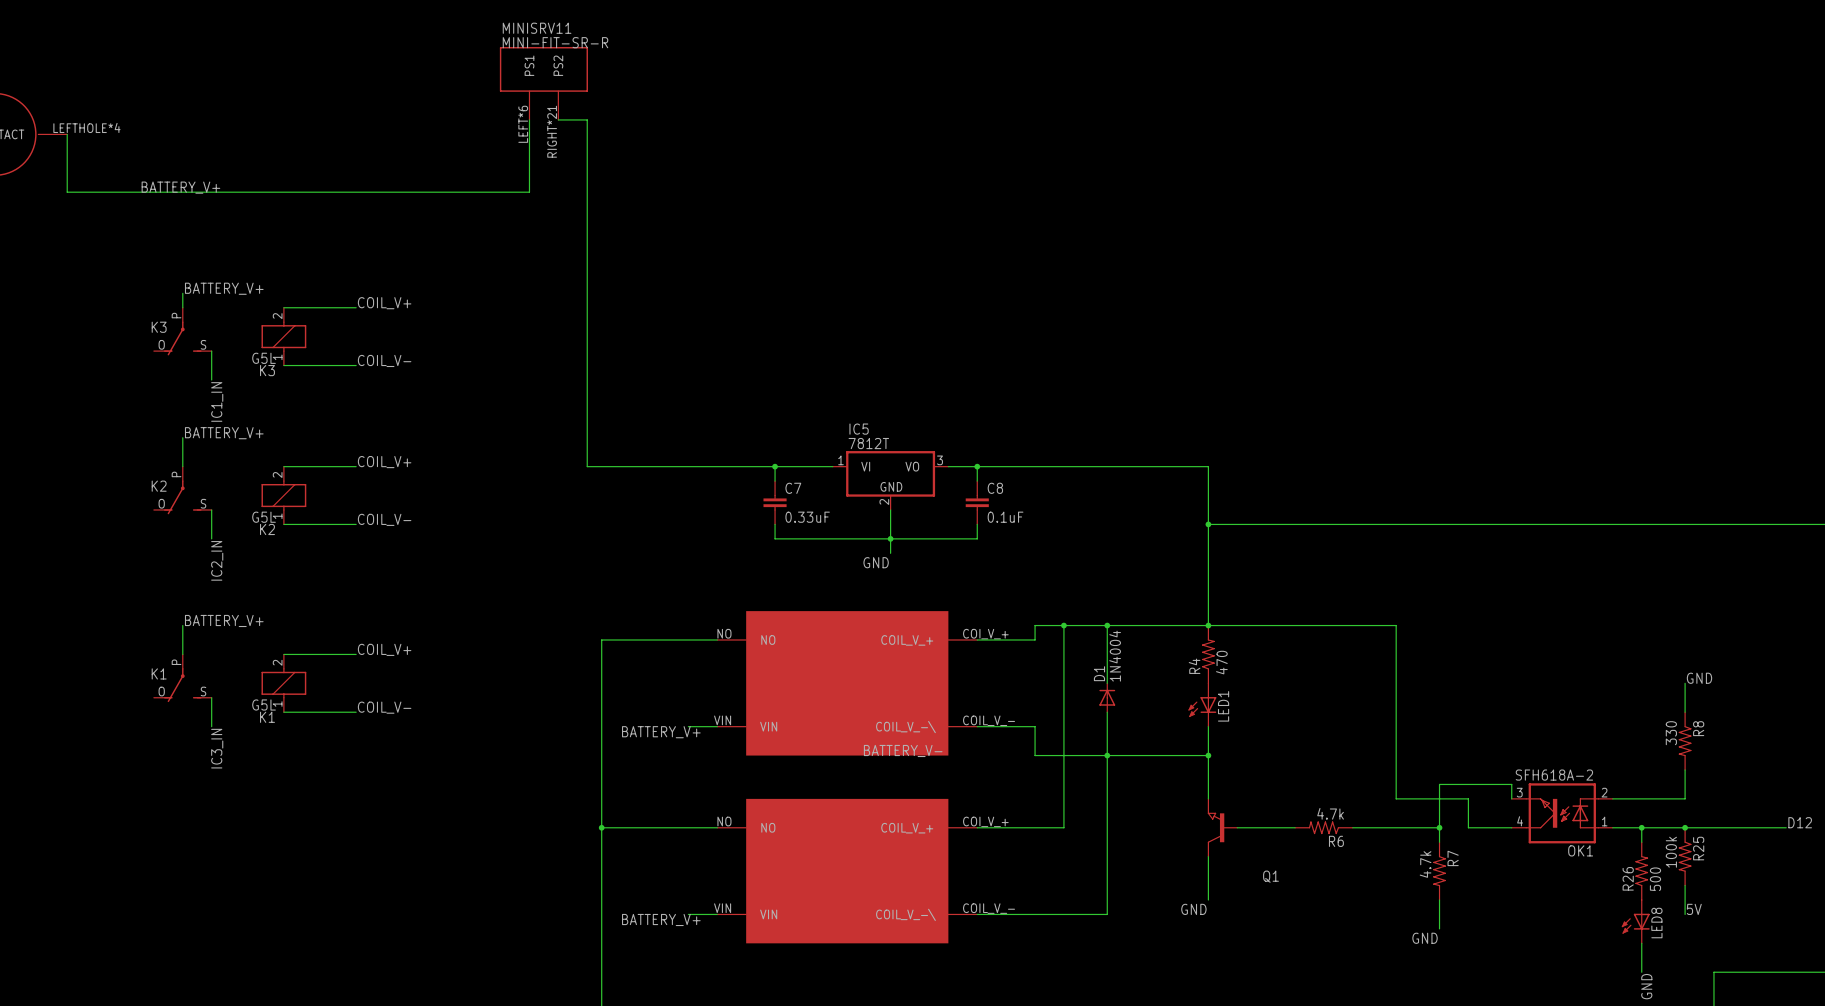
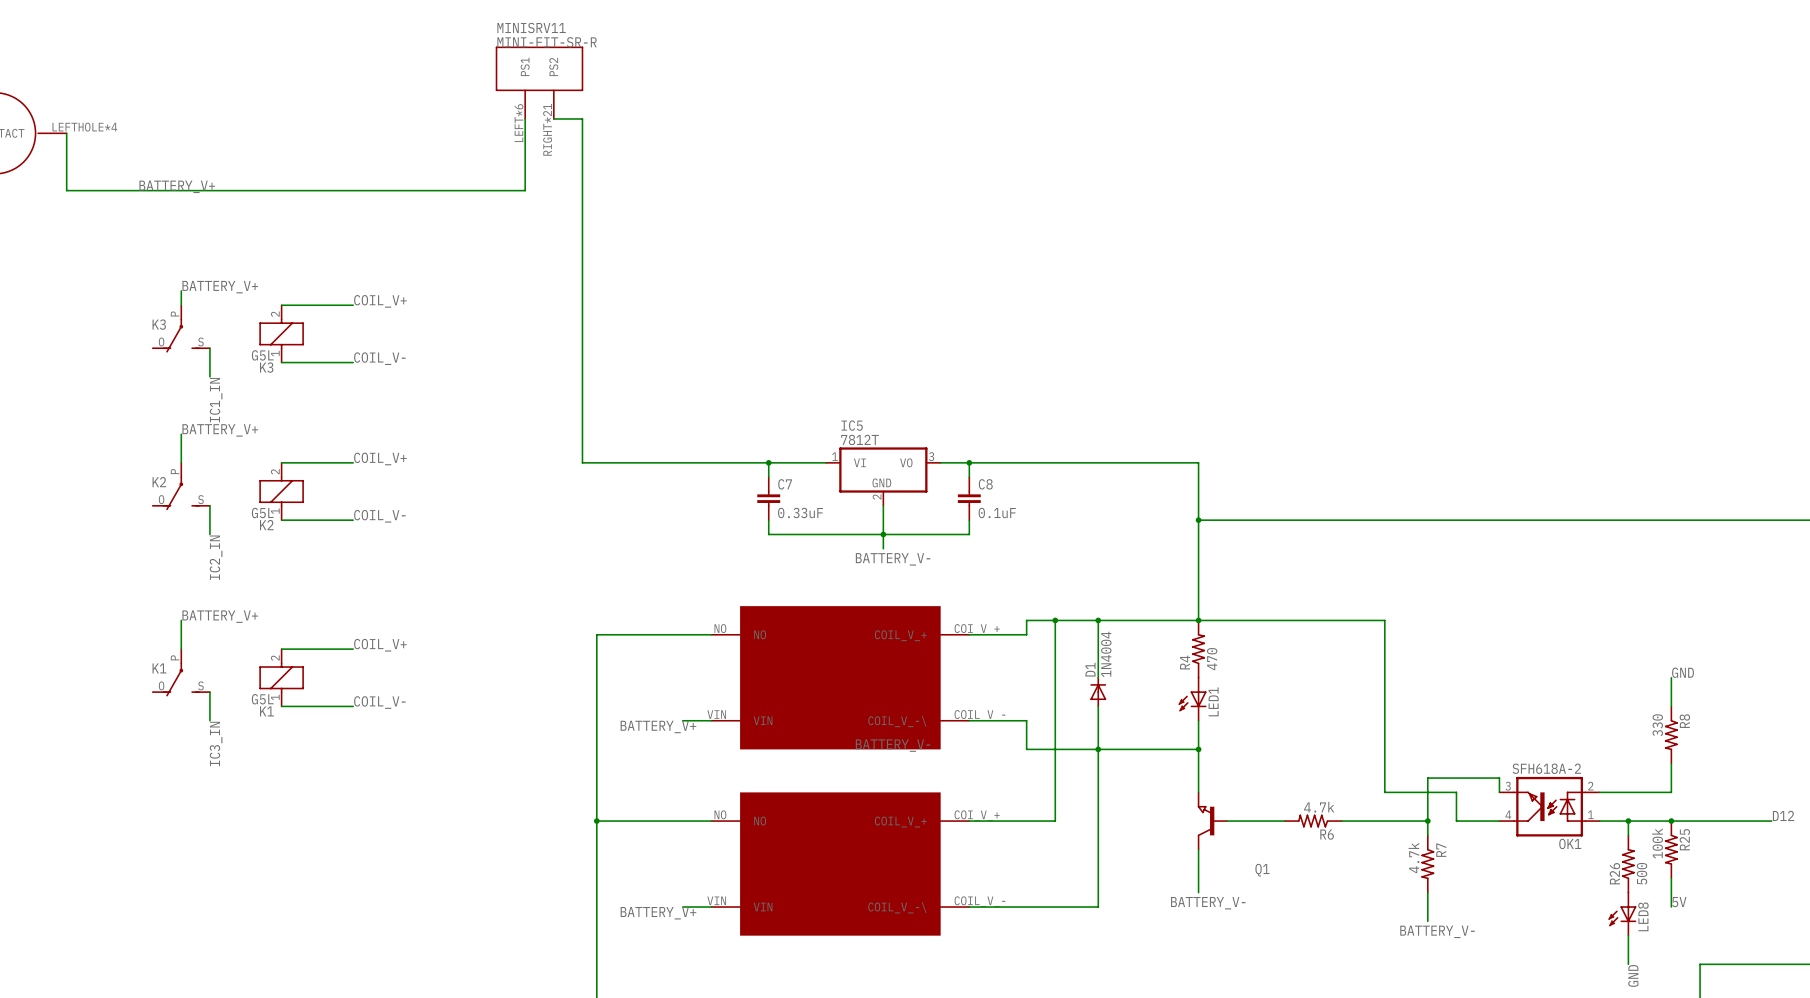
label: GND (876, 562) -> BATTERY_V- (893, 559)
label: GND (1193, 909) -> BATTERY_V- (1208, 903)
label: GND (1425, 938) -> BATTERY_V- (1437, 931)

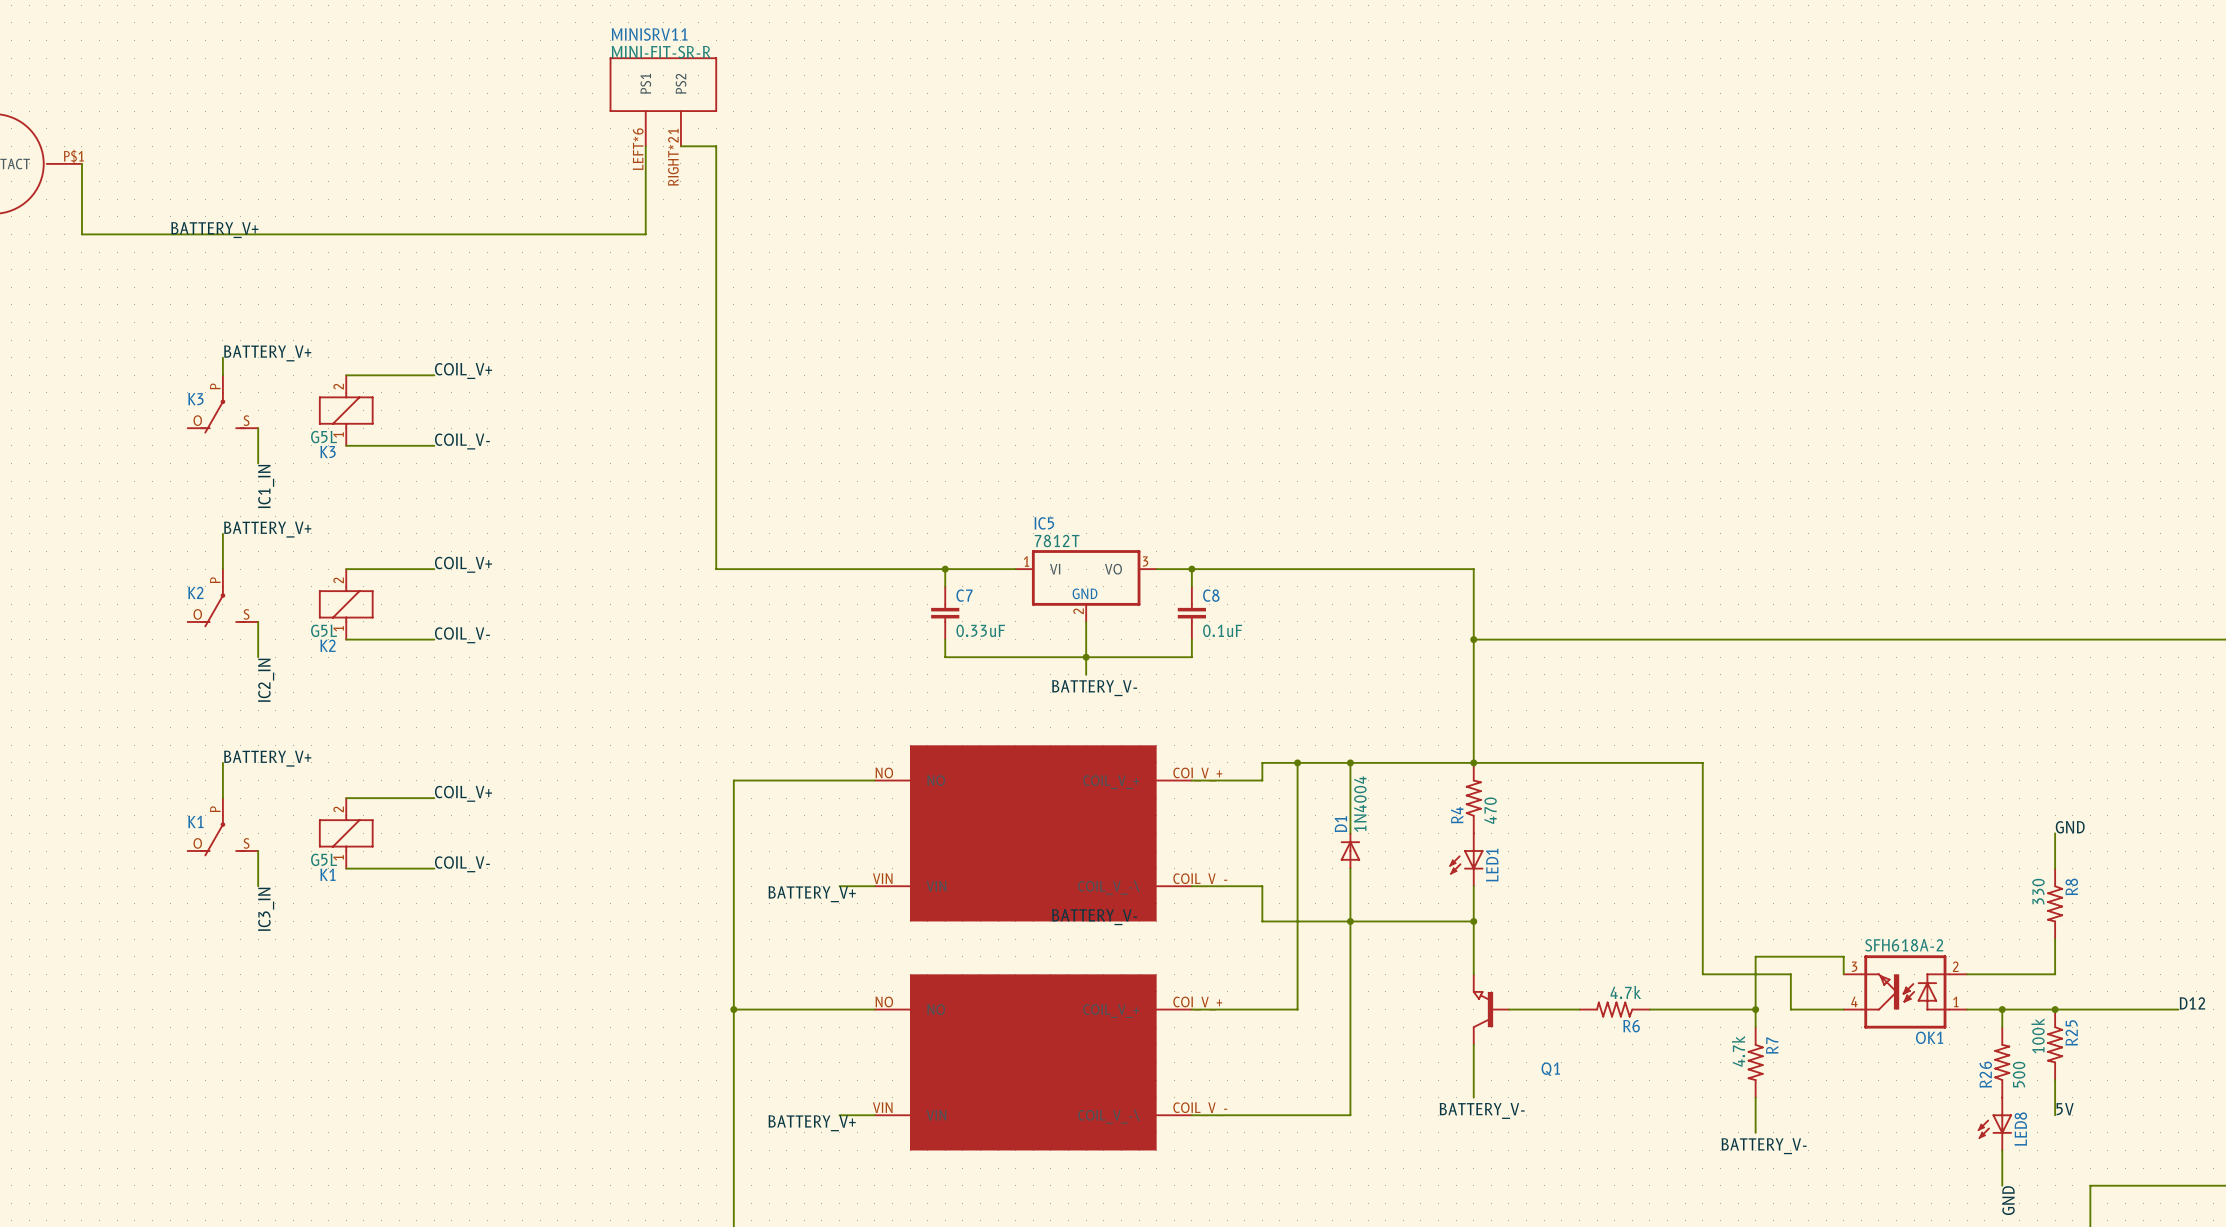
part pin number: LEFTHOLE*4 (84, 127) -> P$1 (73, 156)

